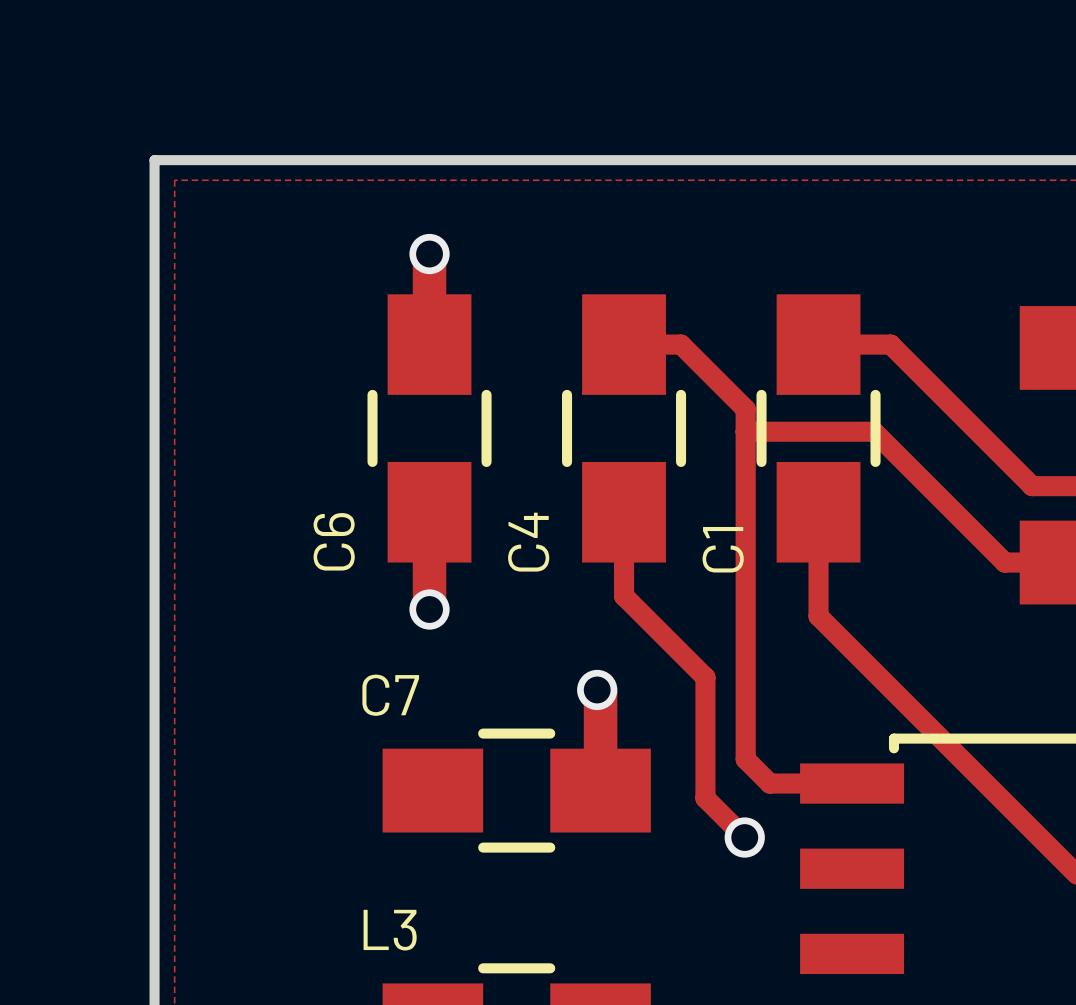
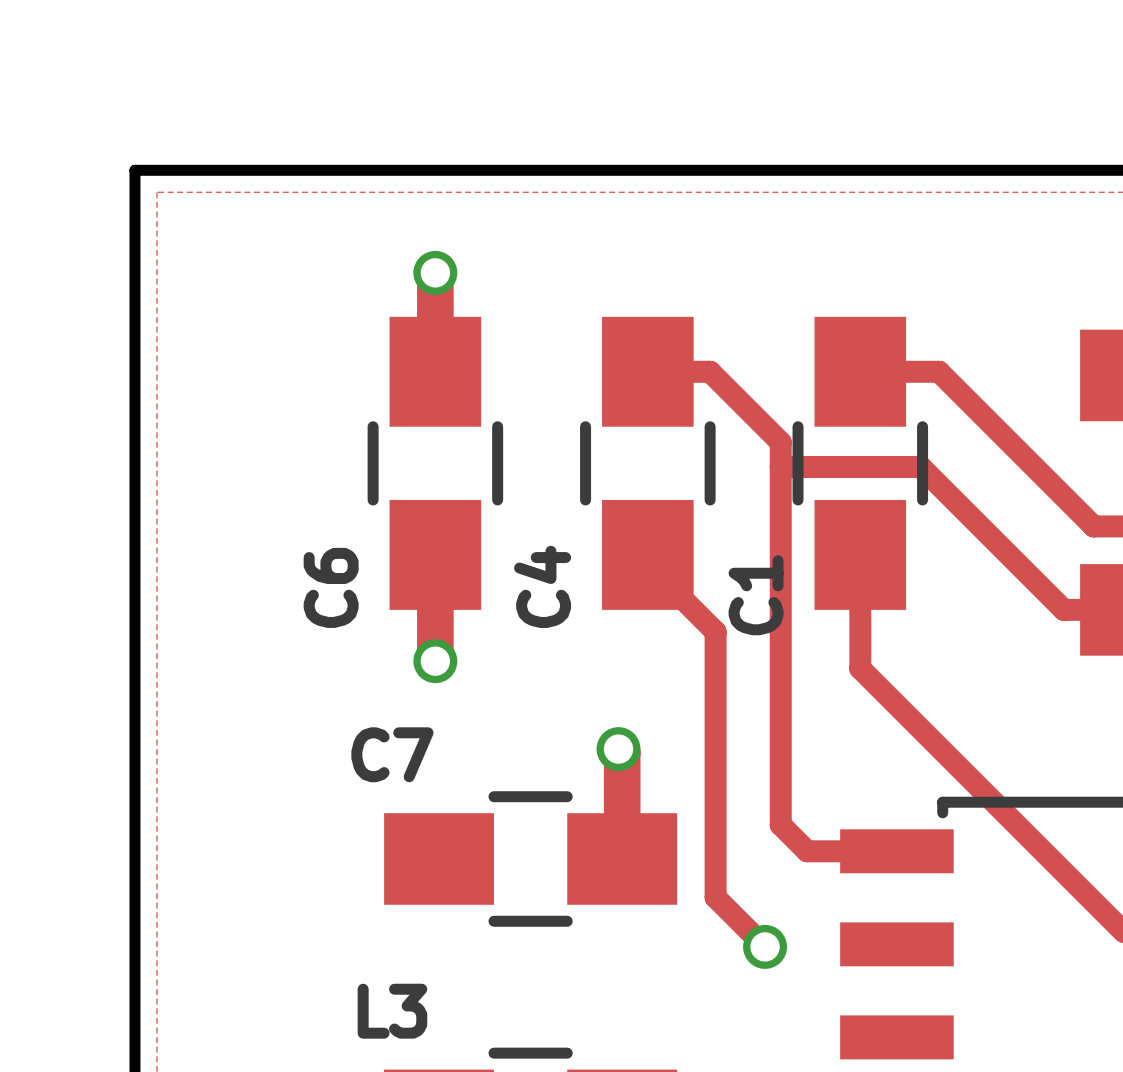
track: (624, 520) (624, 596) (705, 677) (705, 798) (744, 837) -> (647, 564) (715, 631) (715, 897) (765, 946)
via position: (744, 837) -> (765, 946)

